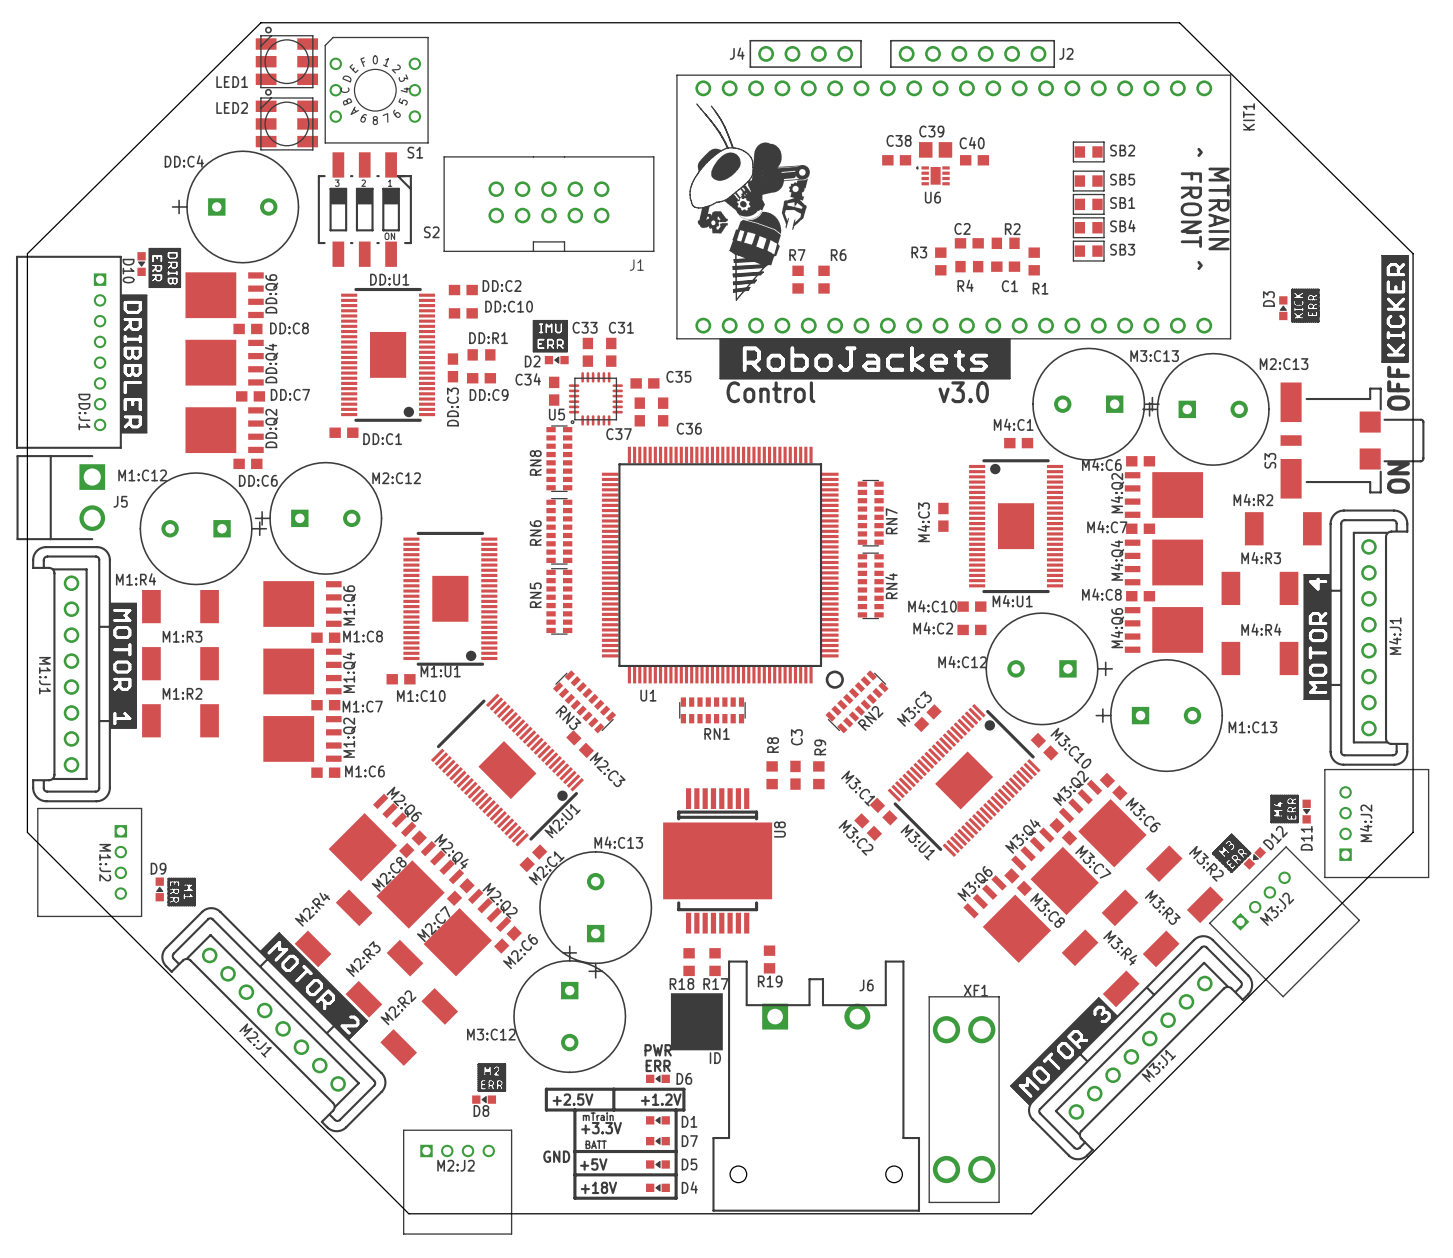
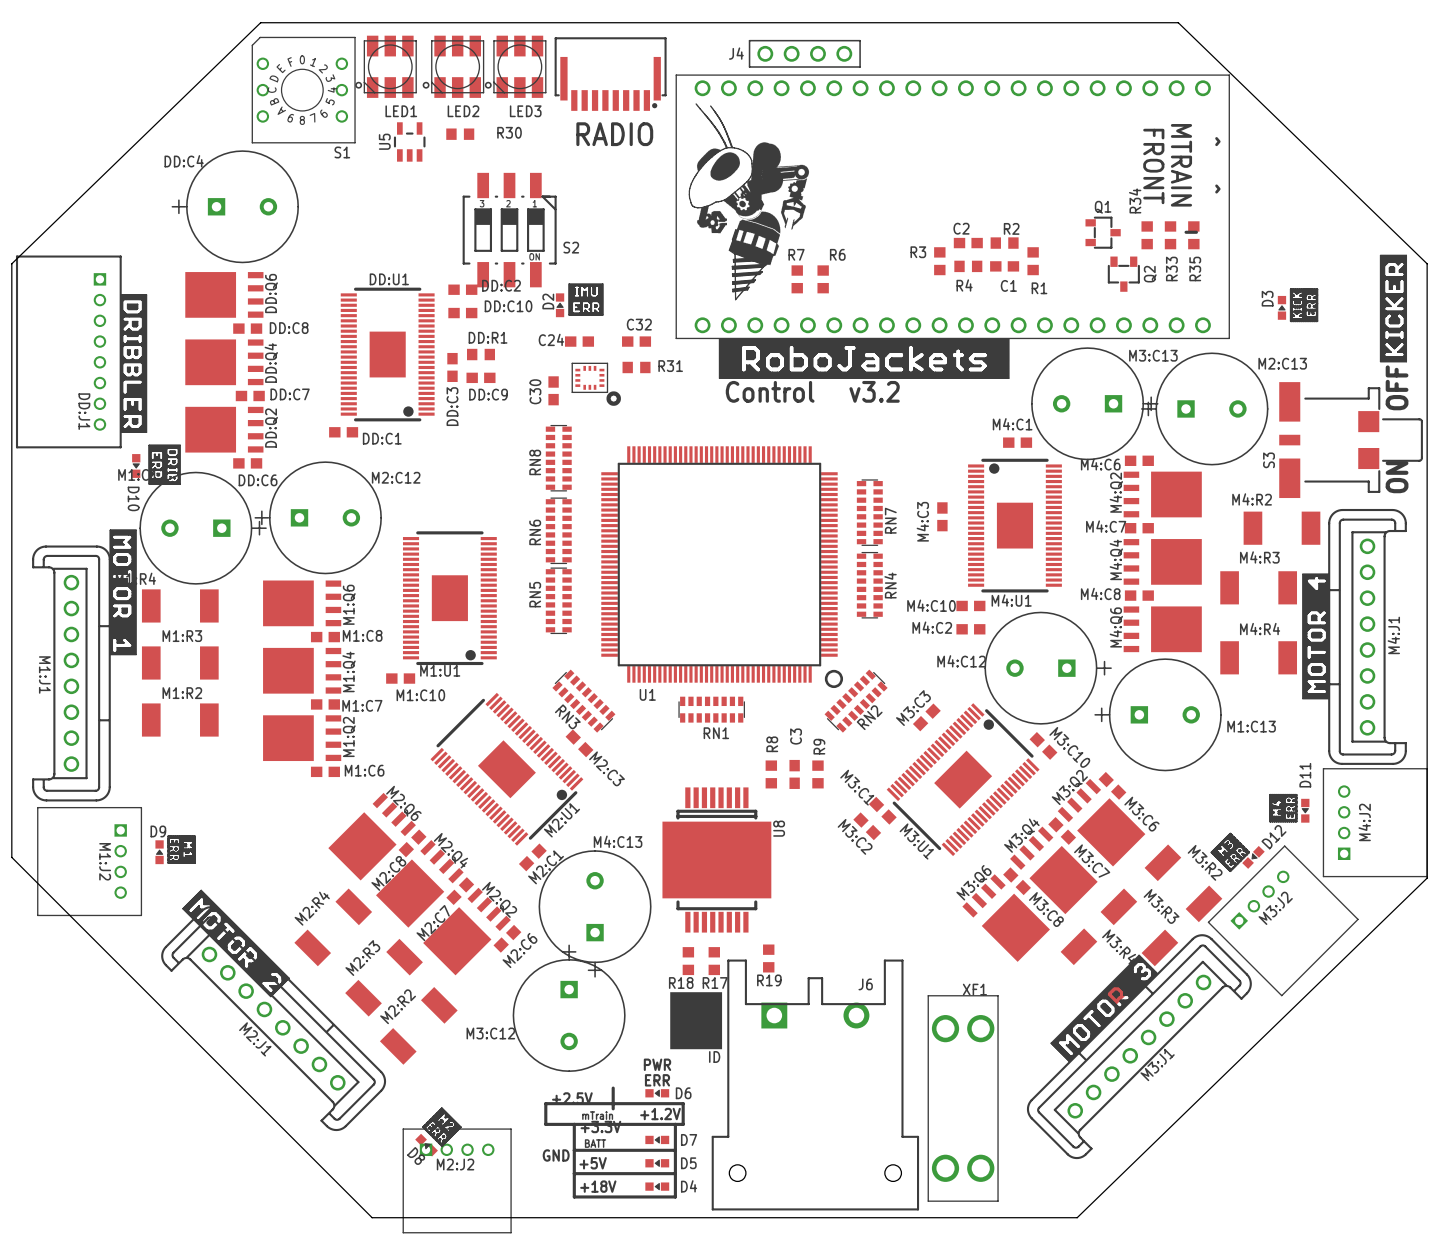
board edge: (260, 22) (27, 253) (27, 832) (408, 1213) (1031, 1213) (1413, 832) (1413, 253) (1179, 22) -> (260, 22) (11, 263) (11, 857) (372, 1217) (1077, 1217) (1427, 878) (1427, 263) (1178, 22)
J2: (972, 53) -> none
LED1 rotation: 0° (286, 57) -> 90° counterclockwise (386, 66)
LED1 position: (286, 57) -> (386, 66)
LED3: none -> (515, 66)
RADIO: none -> (610, 74)
S1 position: (376, 90) -> (303, 90)
KIT1 name: KIT1 (1248, 116) -> none
LED2 rotation: 0° (286, 119) -> 90° counterclockwise (453, 66)
LED2 position: (286, 119) -> (453, 66)
R30: none -> (460, 134)
C39: (935, 149) -> none
SB2: (1088, 151) -> none
C38: (896, 160) -> none
C40: (974, 160) -> none
text: none -> ^ ^ (1217, 165)
U6: (932, 175) -> none
SB5: (1088, 181) -> none
J1: (548, 204) -> none
SB1: (1088, 204) -> none
text: ^ FRONT ^ (1191, 208) -> FRONT (1153, 166)
text position: MTRAIN (1219, 208) -> MTRAIN (1181, 165)
S2 position: (364, 209) -> (509, 230)
SB4: (1088, 227) -> none
S2 name position: S2 (431, 232) -> S2 (571, 247)
Q1: none -> (1103, 232)
R34: none -> (1147, 235)
R33: none -> (1170, 235)
R35: none -> (1193, 235)
SB3: (1088, 251) -> none
D10 position: (141, 264) -> (136, 465)
drawing position: (164, 267) -> (164, 464)
D10 name position: D10 (128, 271) -> D10 (133, 498)
Q2: none -> (1123, 274)
drawing position: (550, 336) -> (585, 299)
C24: none -> (579, 341)
C32: none -> (636, 341)
C33: (587, 352) -> none
C31: (611, 352) -> none
D2 rotation: 0° (556, 360) -> 90° clockwise (560, 305)
D2 position: (556, 360) -> (560, 305)
R31: none -> (636, 367)
U5 footprint: [568, 372, 623, 426] -> [393, 122, 426, 162]
C34 name: C34 (528, 379) -> C30 (535, 391)
C35: (644, 383) -> none
part: none -> (596, 384)
text: none -> v3.2 (874, 391)
text: v3.0 (963, 392) -> none
C37: (639, 411) -> none
C36: (663, 411) -> none
U5 name position: U5 (556, 414) -> U5 (384, 141)
J5: (60, 497) -> none
drawing position: (123, 665) -> (123, 592)
D11 name position: D11 (1306, 838) -> D11 (1305, 775)
D9 position: (159, 889) -> (159, 852)
drawing position: (181, 892) -> (181, 849)
drawing position: (314, 985) -> (236, 943)
text: PWR (658, 1050) -> none
drawing position: (1063, 1050) -> (1104, 1008)
drawing: [477, 1063, 507, 1092] -> none
text: ERR (658, 1065) -> PWR (657, 1064)
D6 position: (657, 1078) -> (657, 1093)
text: none -> ERR (657, 1080)
D8 rotation: 0° (484, 1099) -> 45° clockwise (426, 1145)
D8 position: (484, 1099) -> (426, 1145)
text position: +1.2V (661, 1099) -> +1.2V (660, 1114)
line: (546, 1104) (546, 1089) (683, 1089) (683, 1104) -> (545, 1103) (683, 1103)
drawing: none -> [422, 1107, 462, 1147]
line: (546, 1110) (683, 1110) -> (545, 1108) (545, 1124) (683, 1124) (683, 1108)
line: (574, 1110) (574, 1125) -> none
line: (676, 1110) (676, 1125) -> none
D1: (657, 1120) -> none

